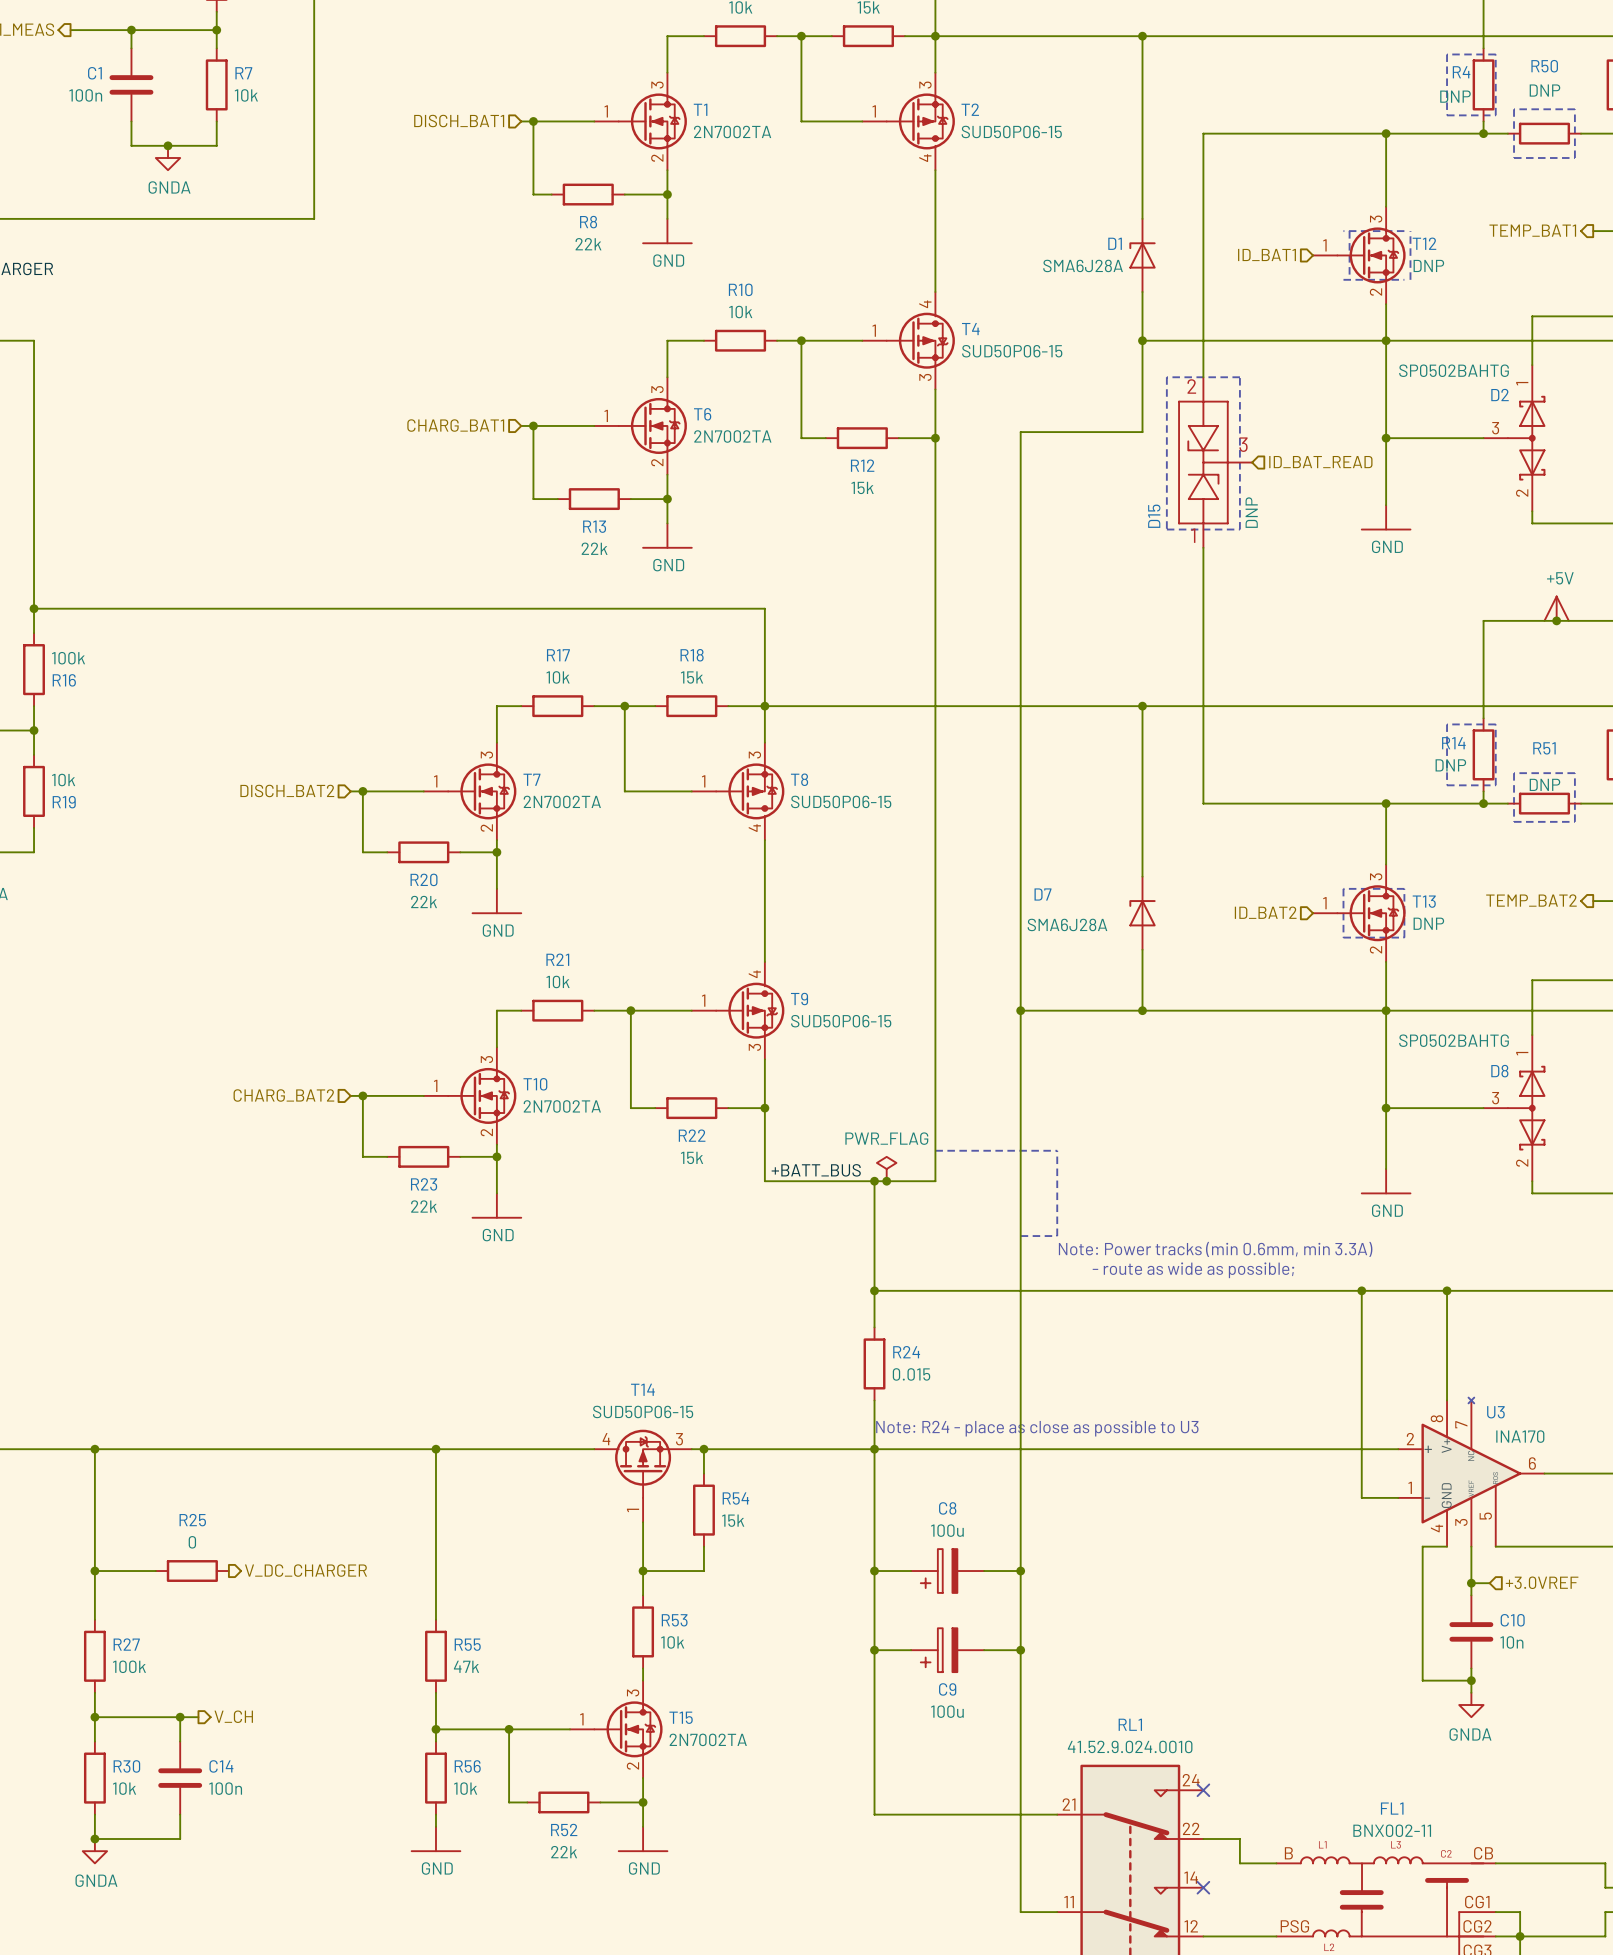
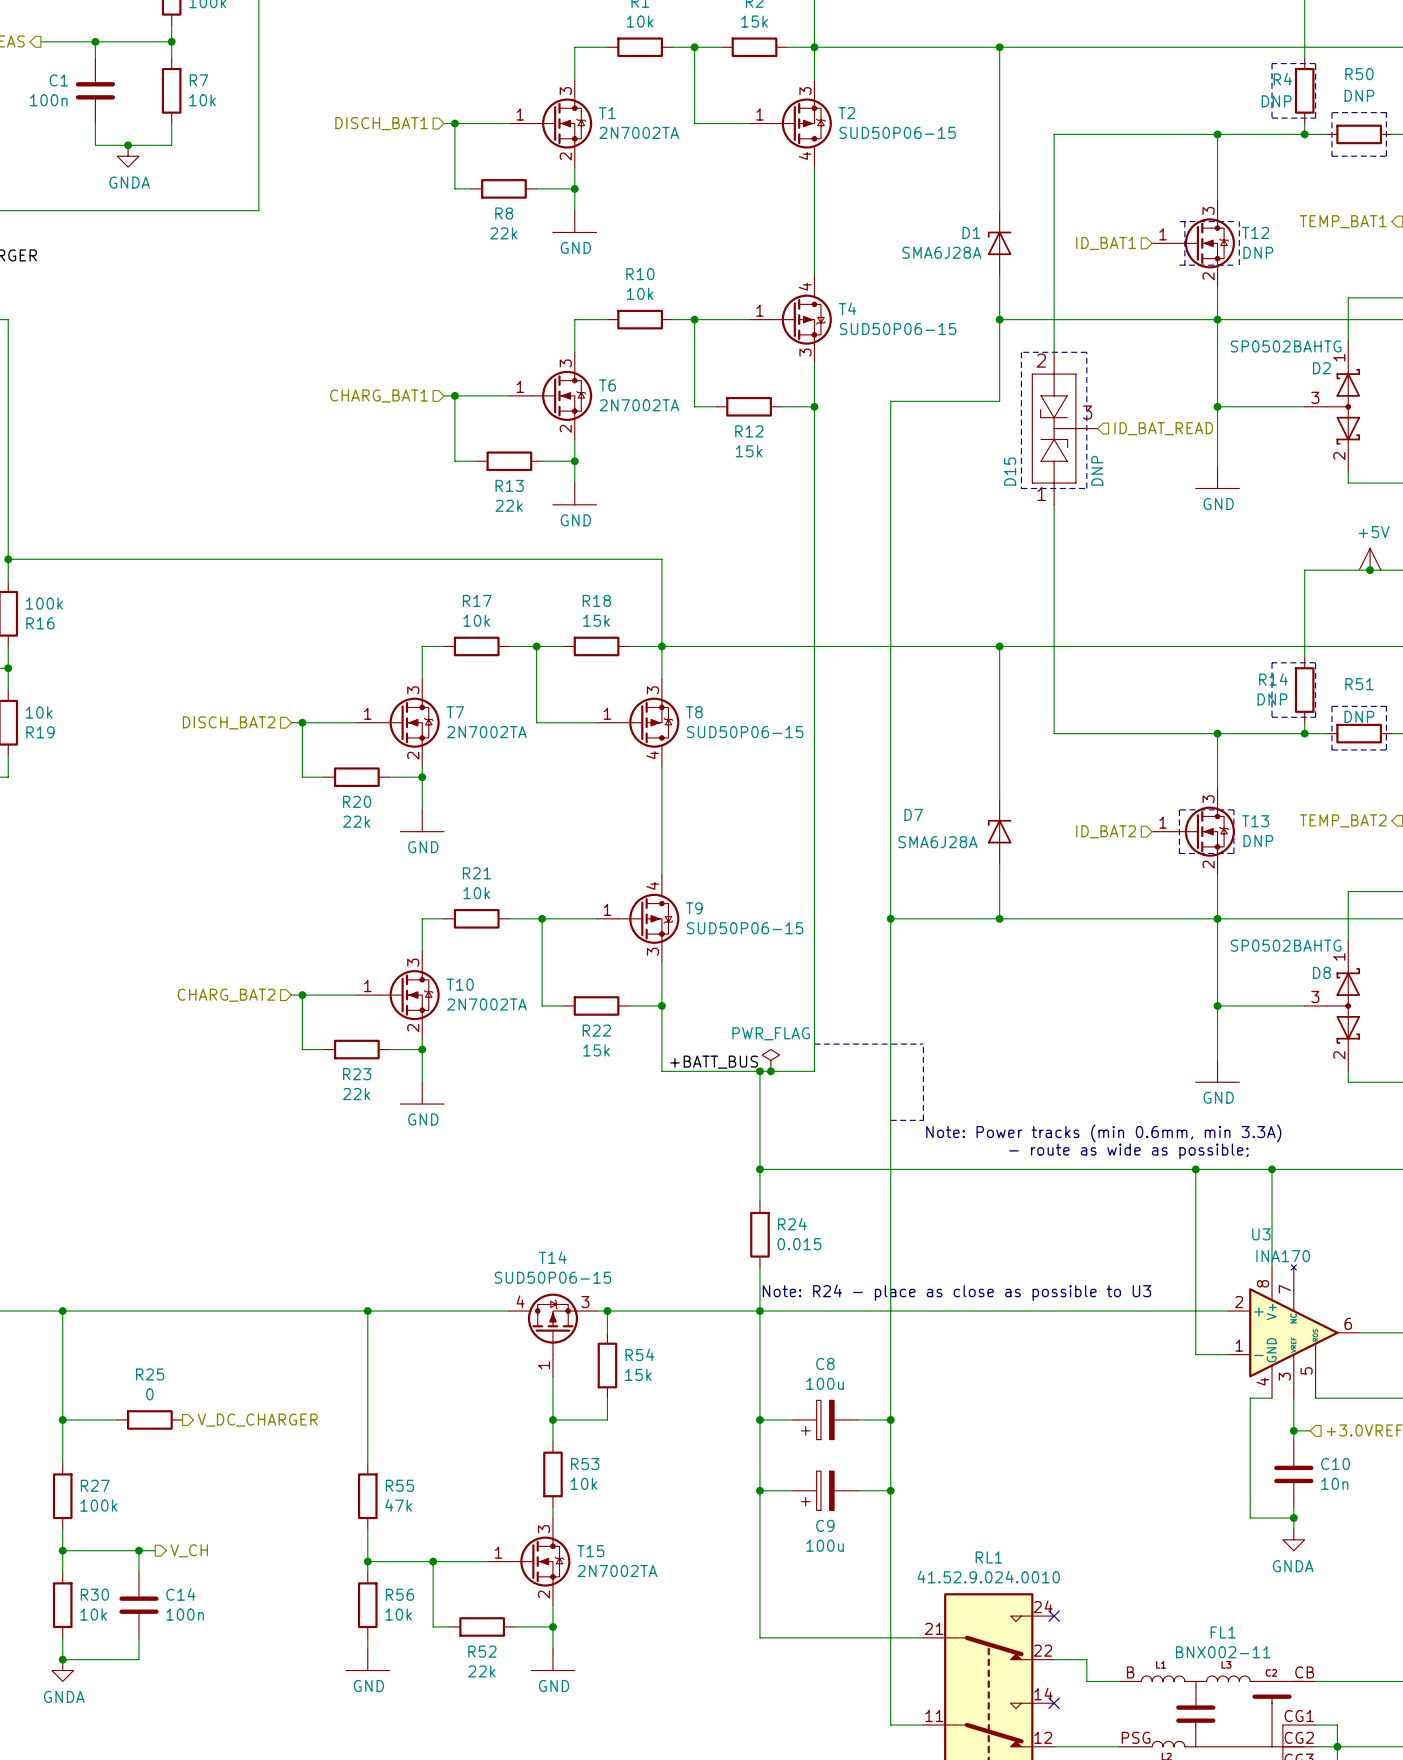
U3 name position: U3 (1495, 1412) -> U3 (1261, 1234)
U3 value position: INA170 (1520, 1436) -> INA170 (1283, 1256)

